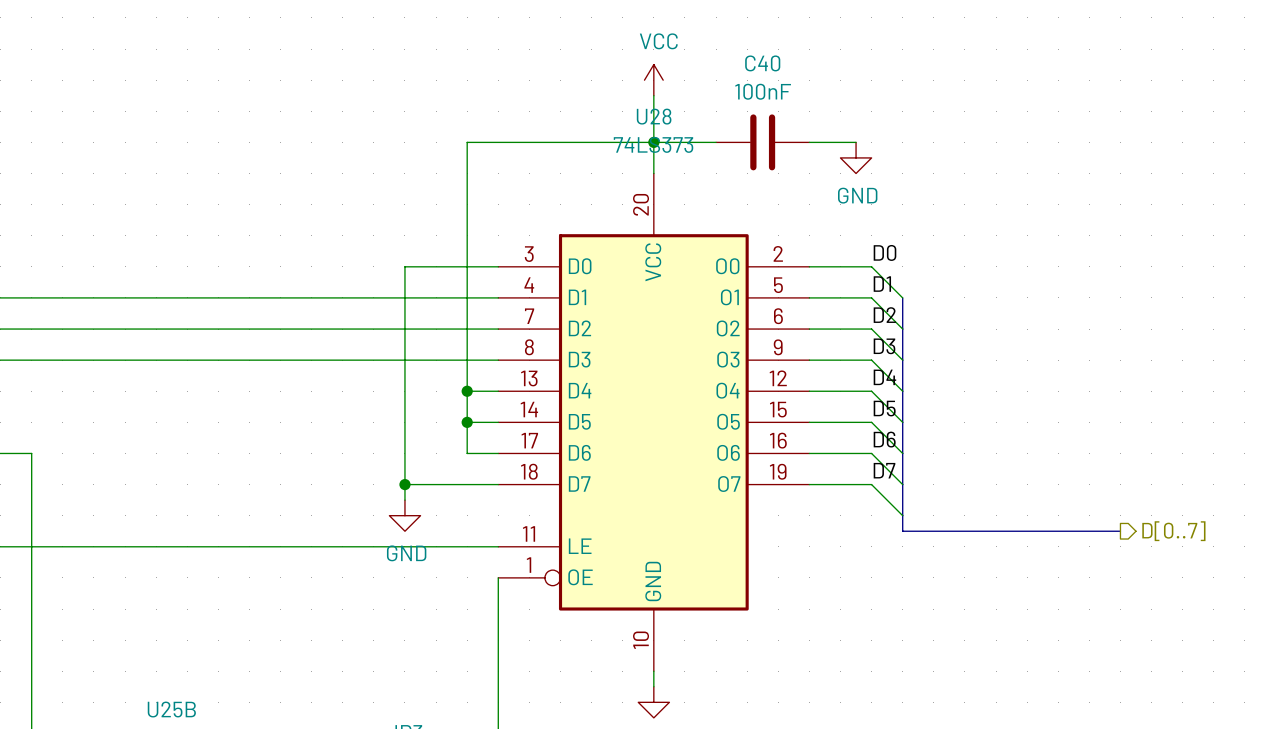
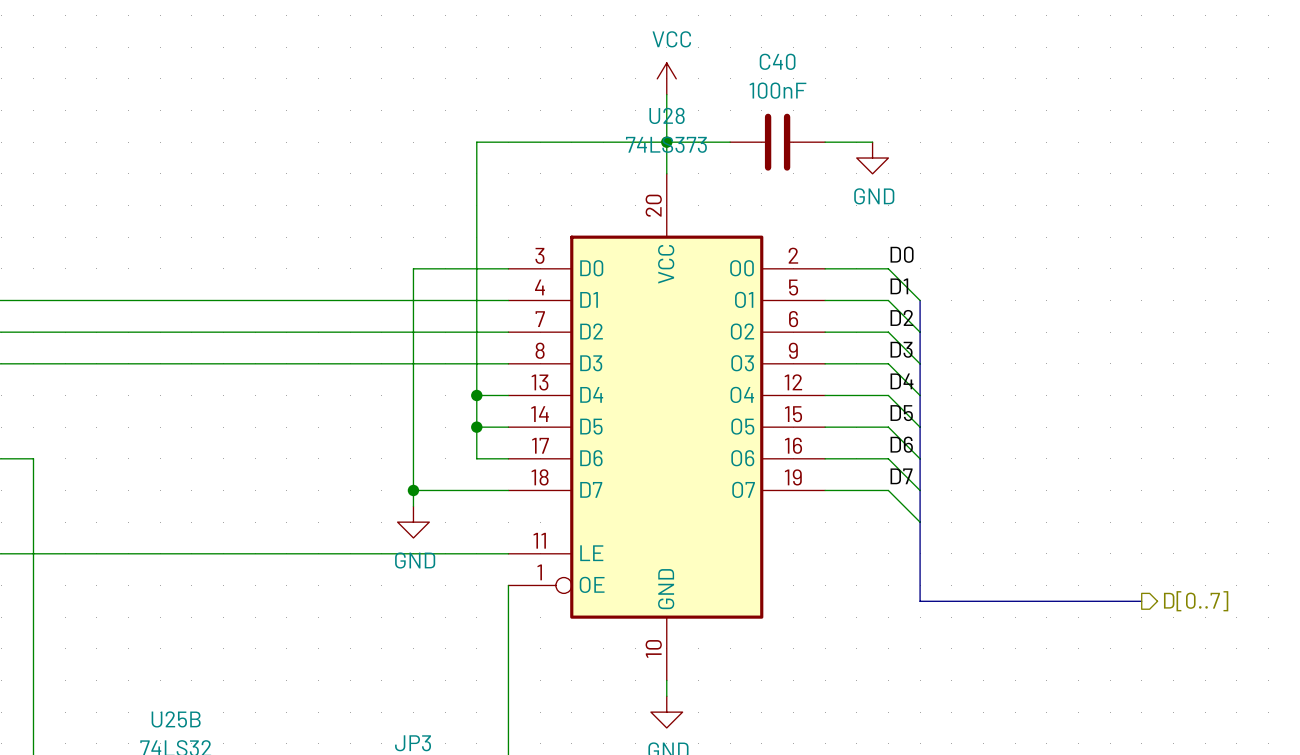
bus: (902, 531) (1120, 531) -> (920, 537) (920, 601) (1141, 601)
hierarchical label position: D[0..7] (1173, 531) -> D[0..7] (1196, 601)

